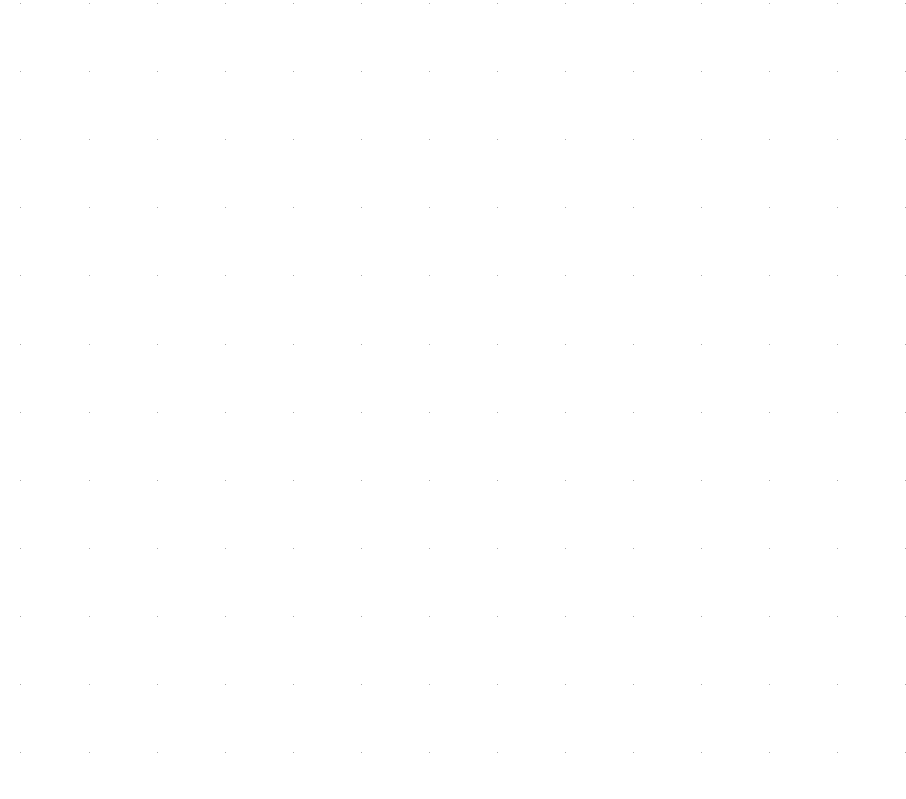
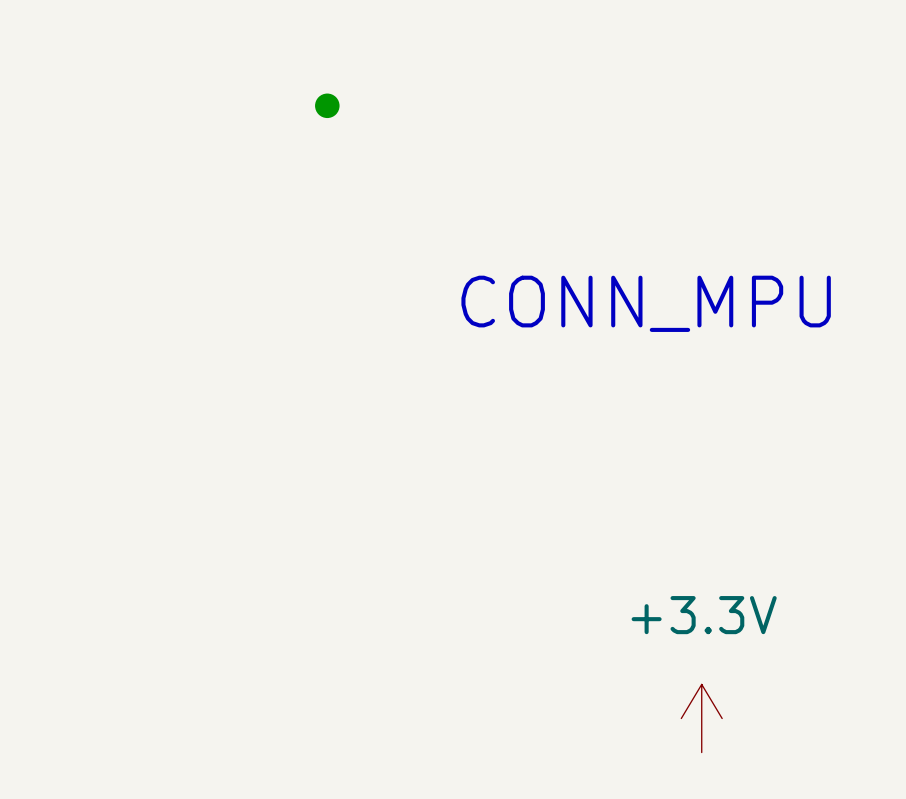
junction: none -> (327, 105)
text: none -> CONN_MPU (646, 303)
power symbol: none -> +3.3V (701, 718)

